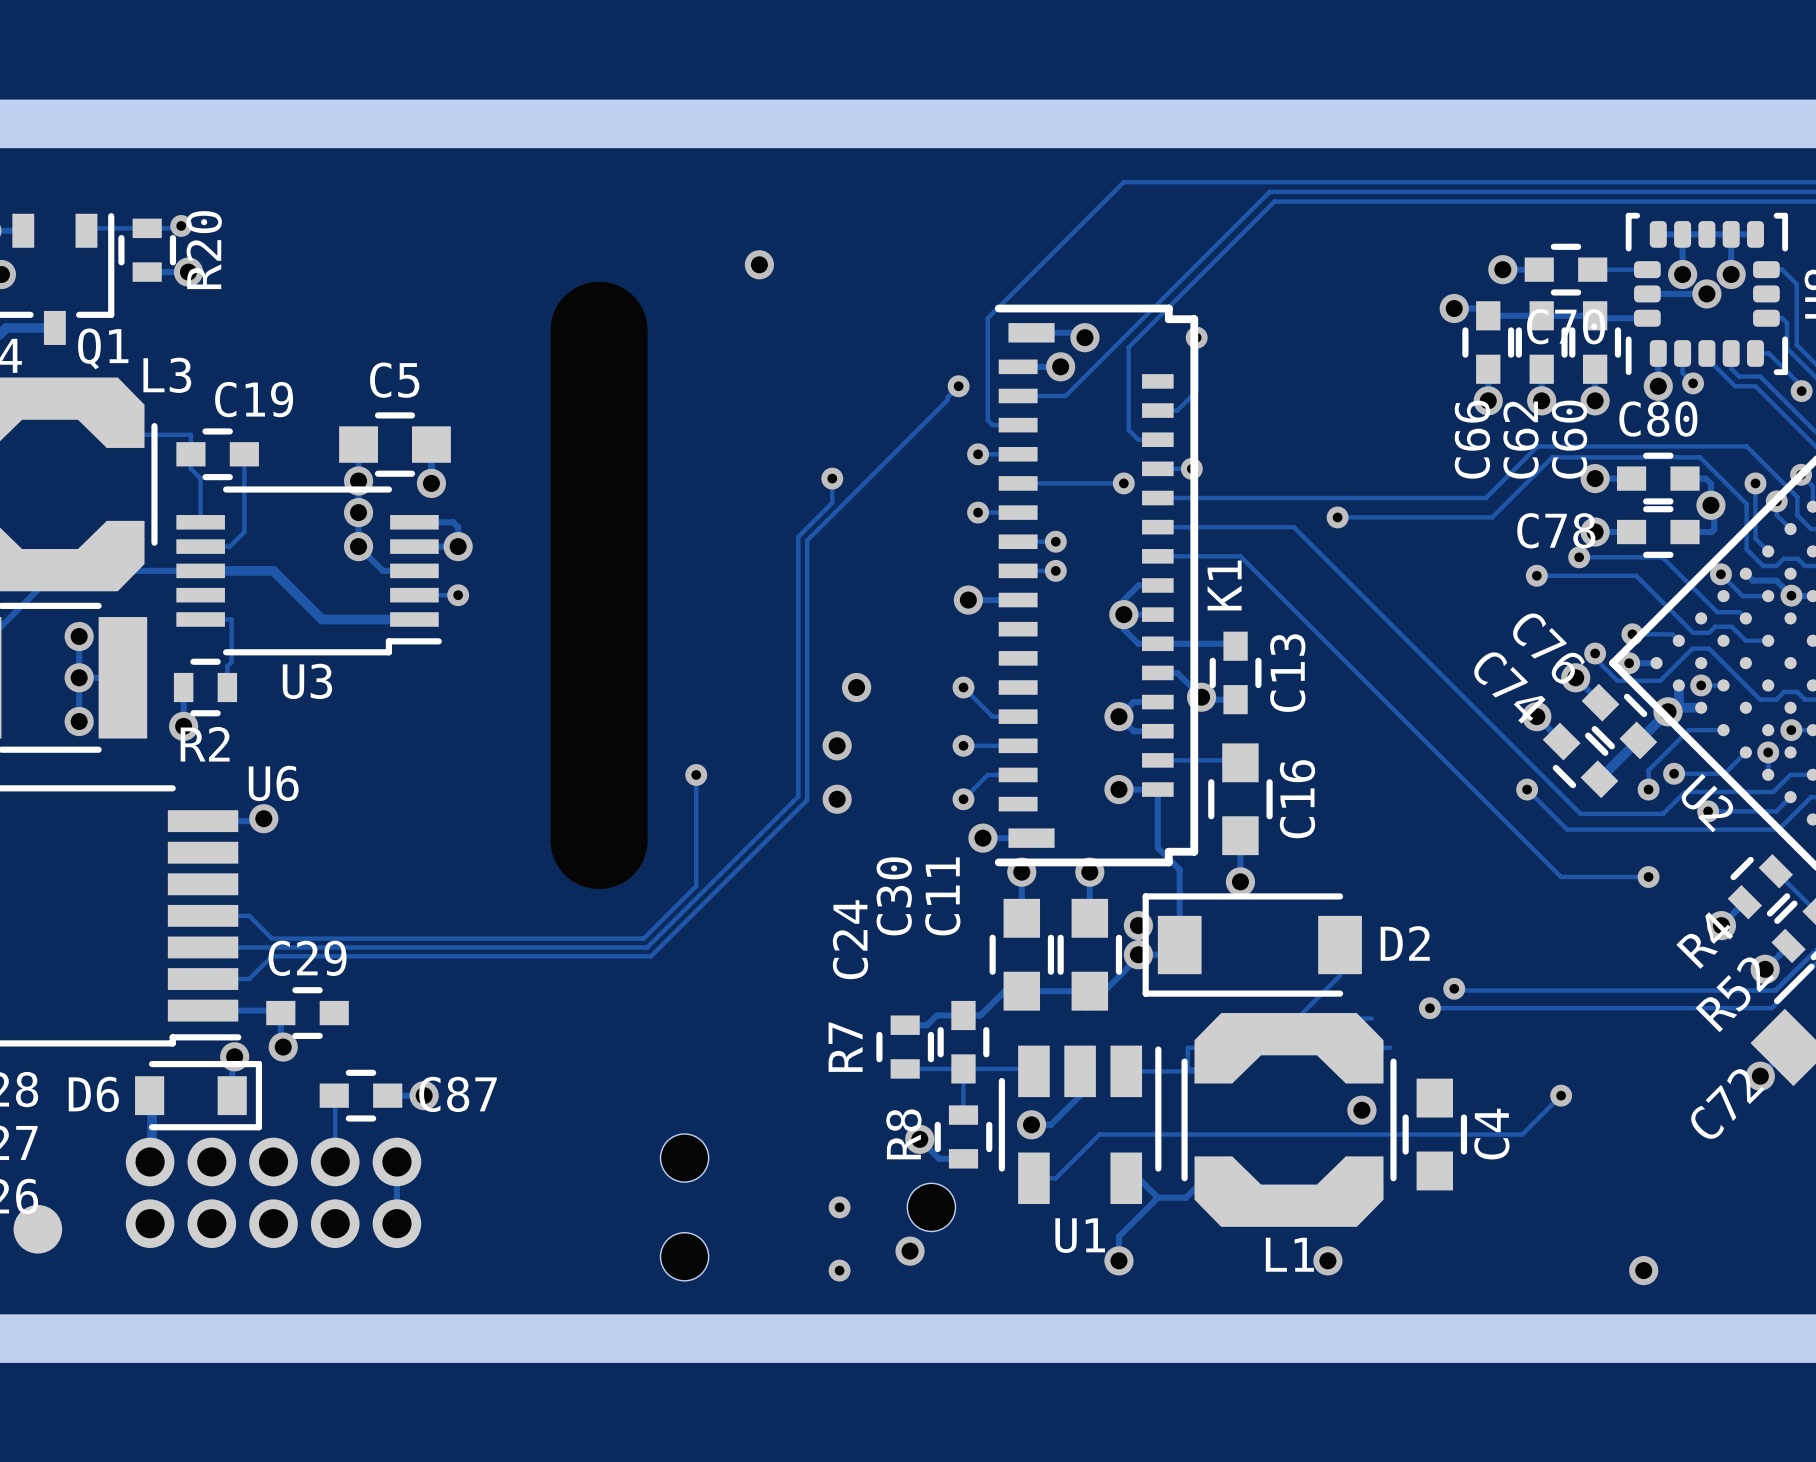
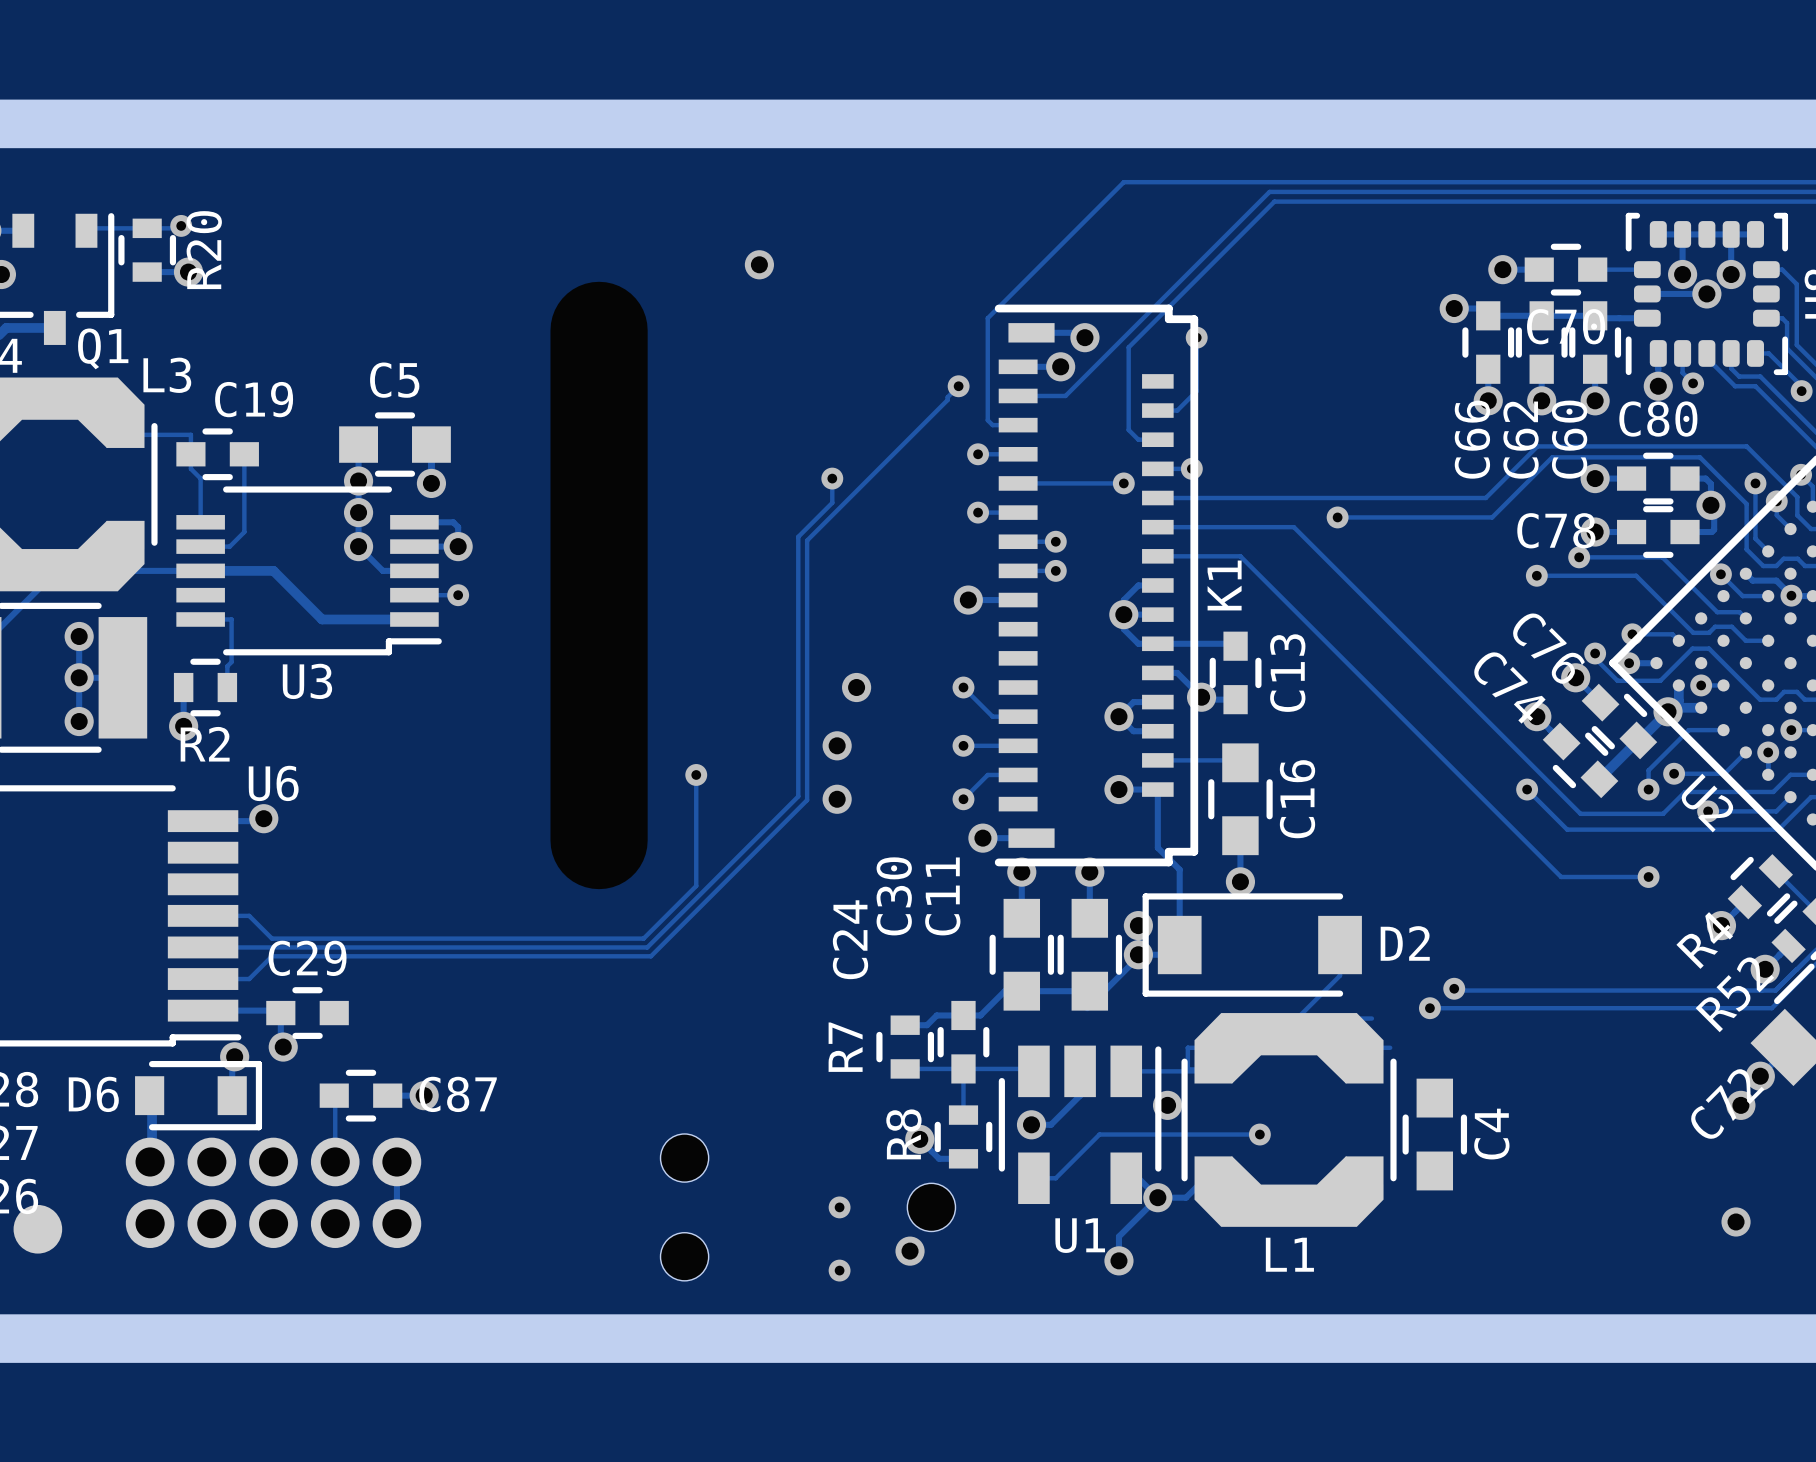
track: (1561, 1095) (1522, 1134) (1259, 1134) -> none
via: (1561, 1095) -> none
via: none -> (1167, 1105)
via: none -> (1740, 1105)
via: (1361, 1110) -> none
via: none -> (1259, 1134)
via: none -> (1157, 1197)
via: none -> (1736, 1221)
via: (1327, 1260) -> none
via: (1643, 1270) -> none

